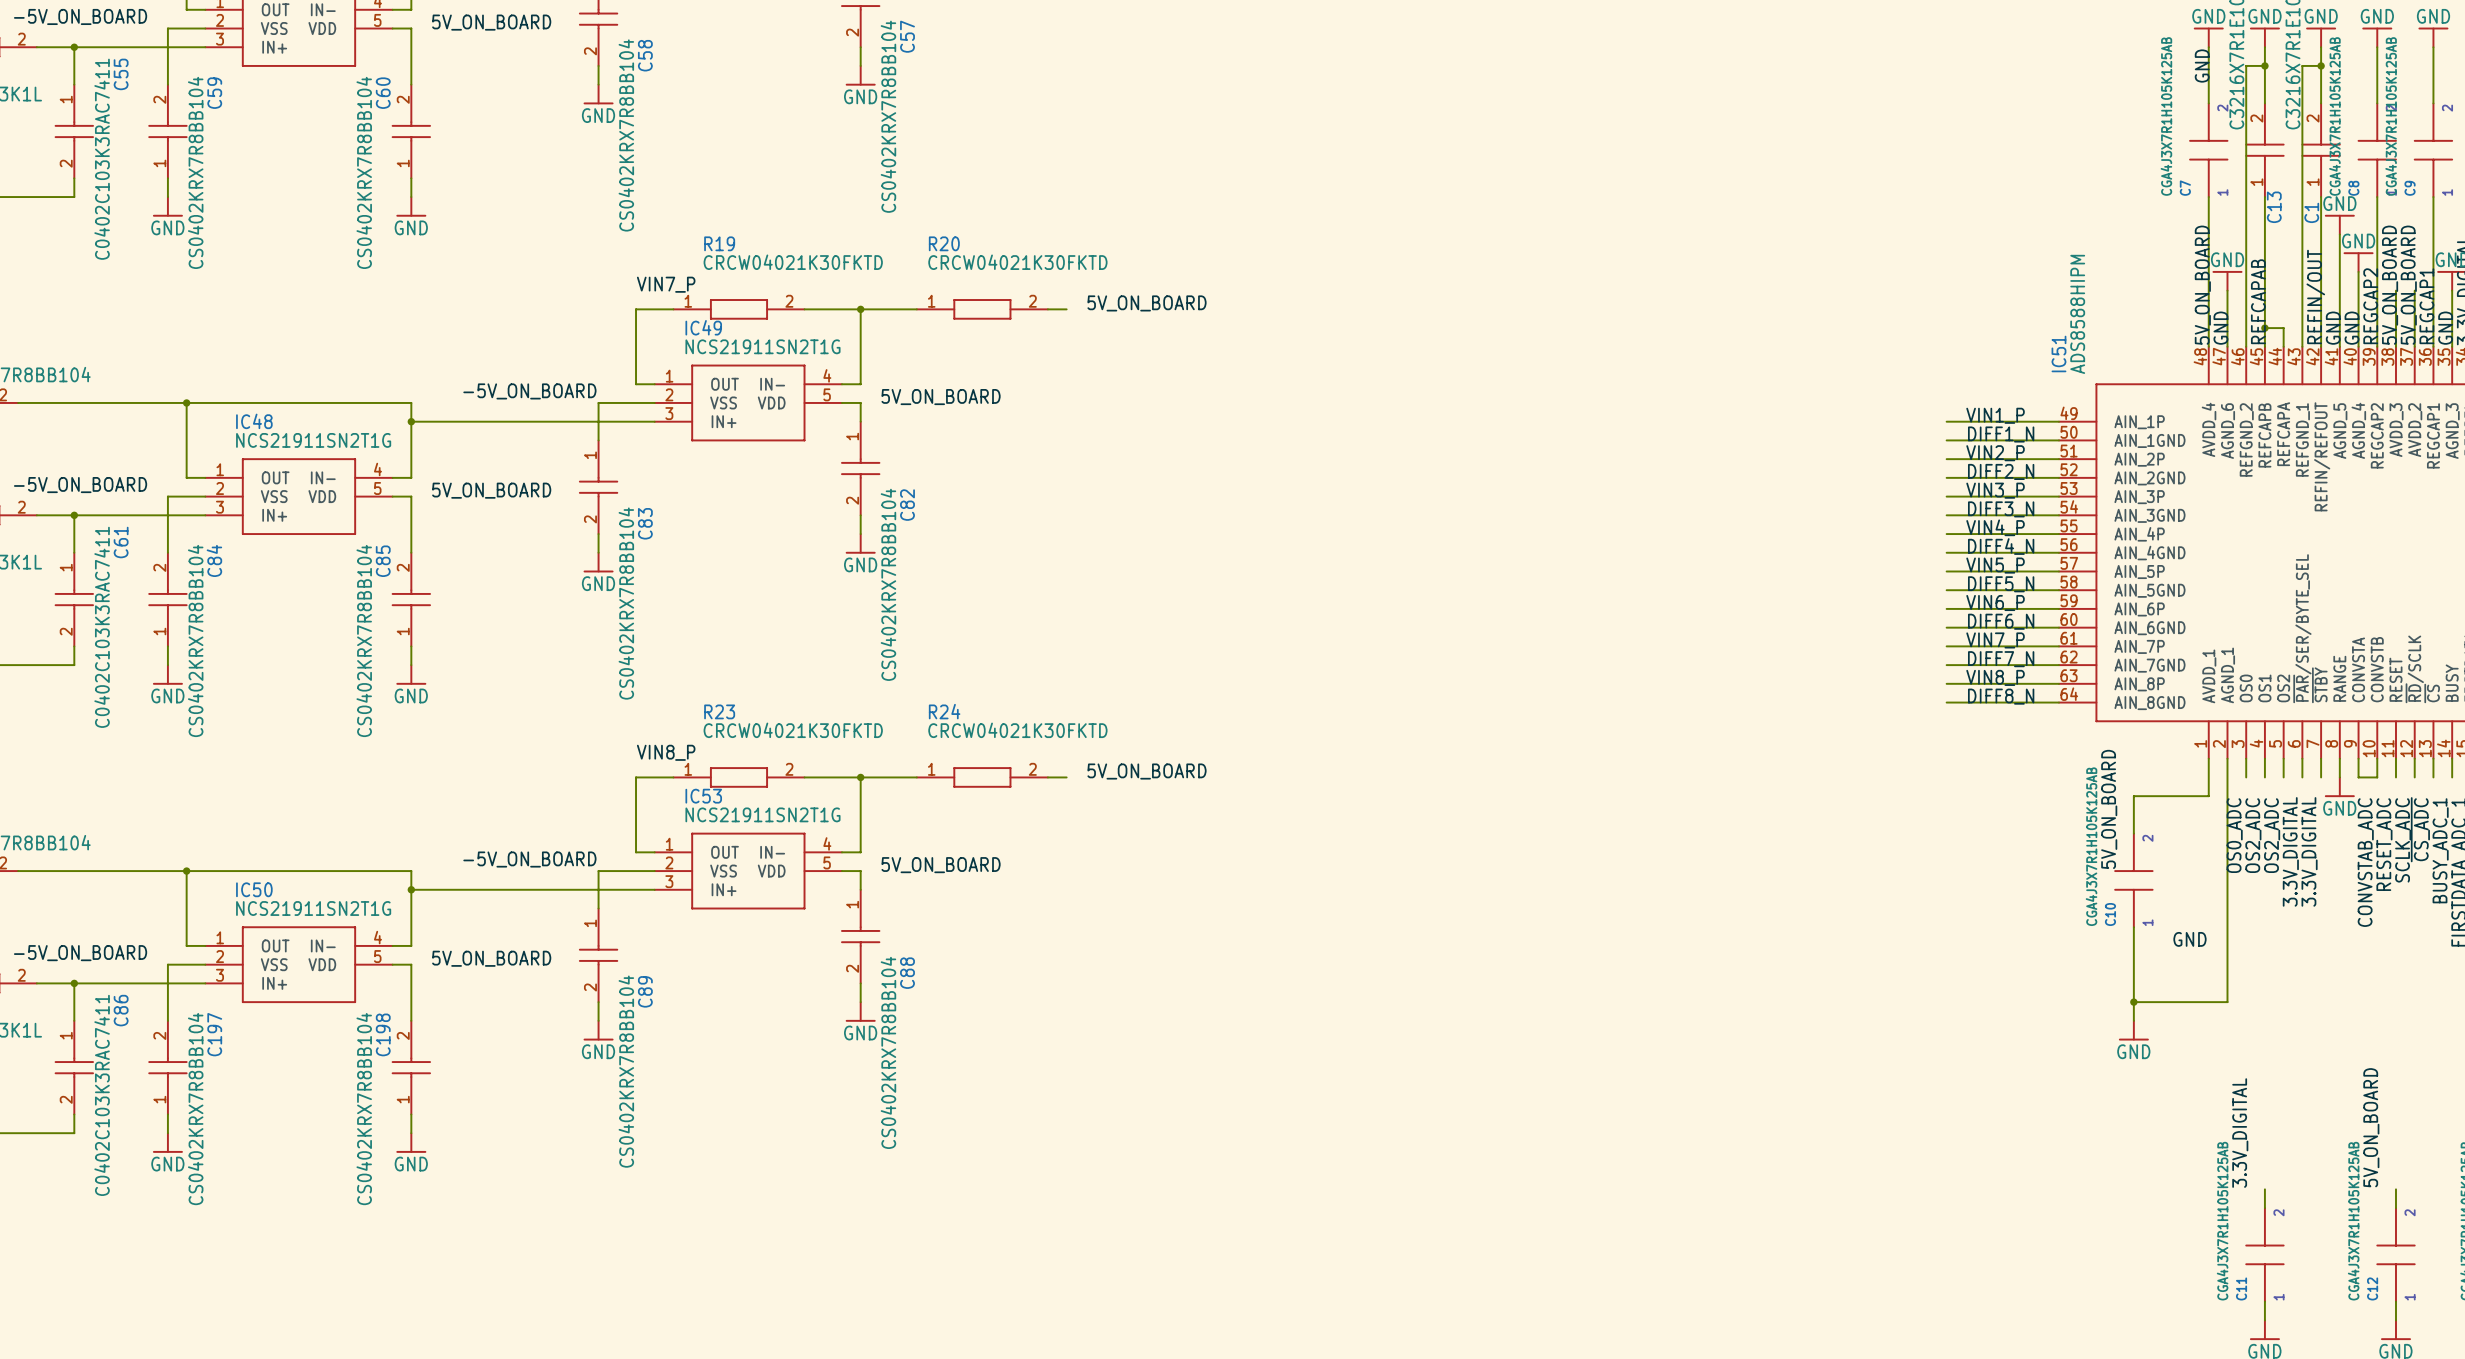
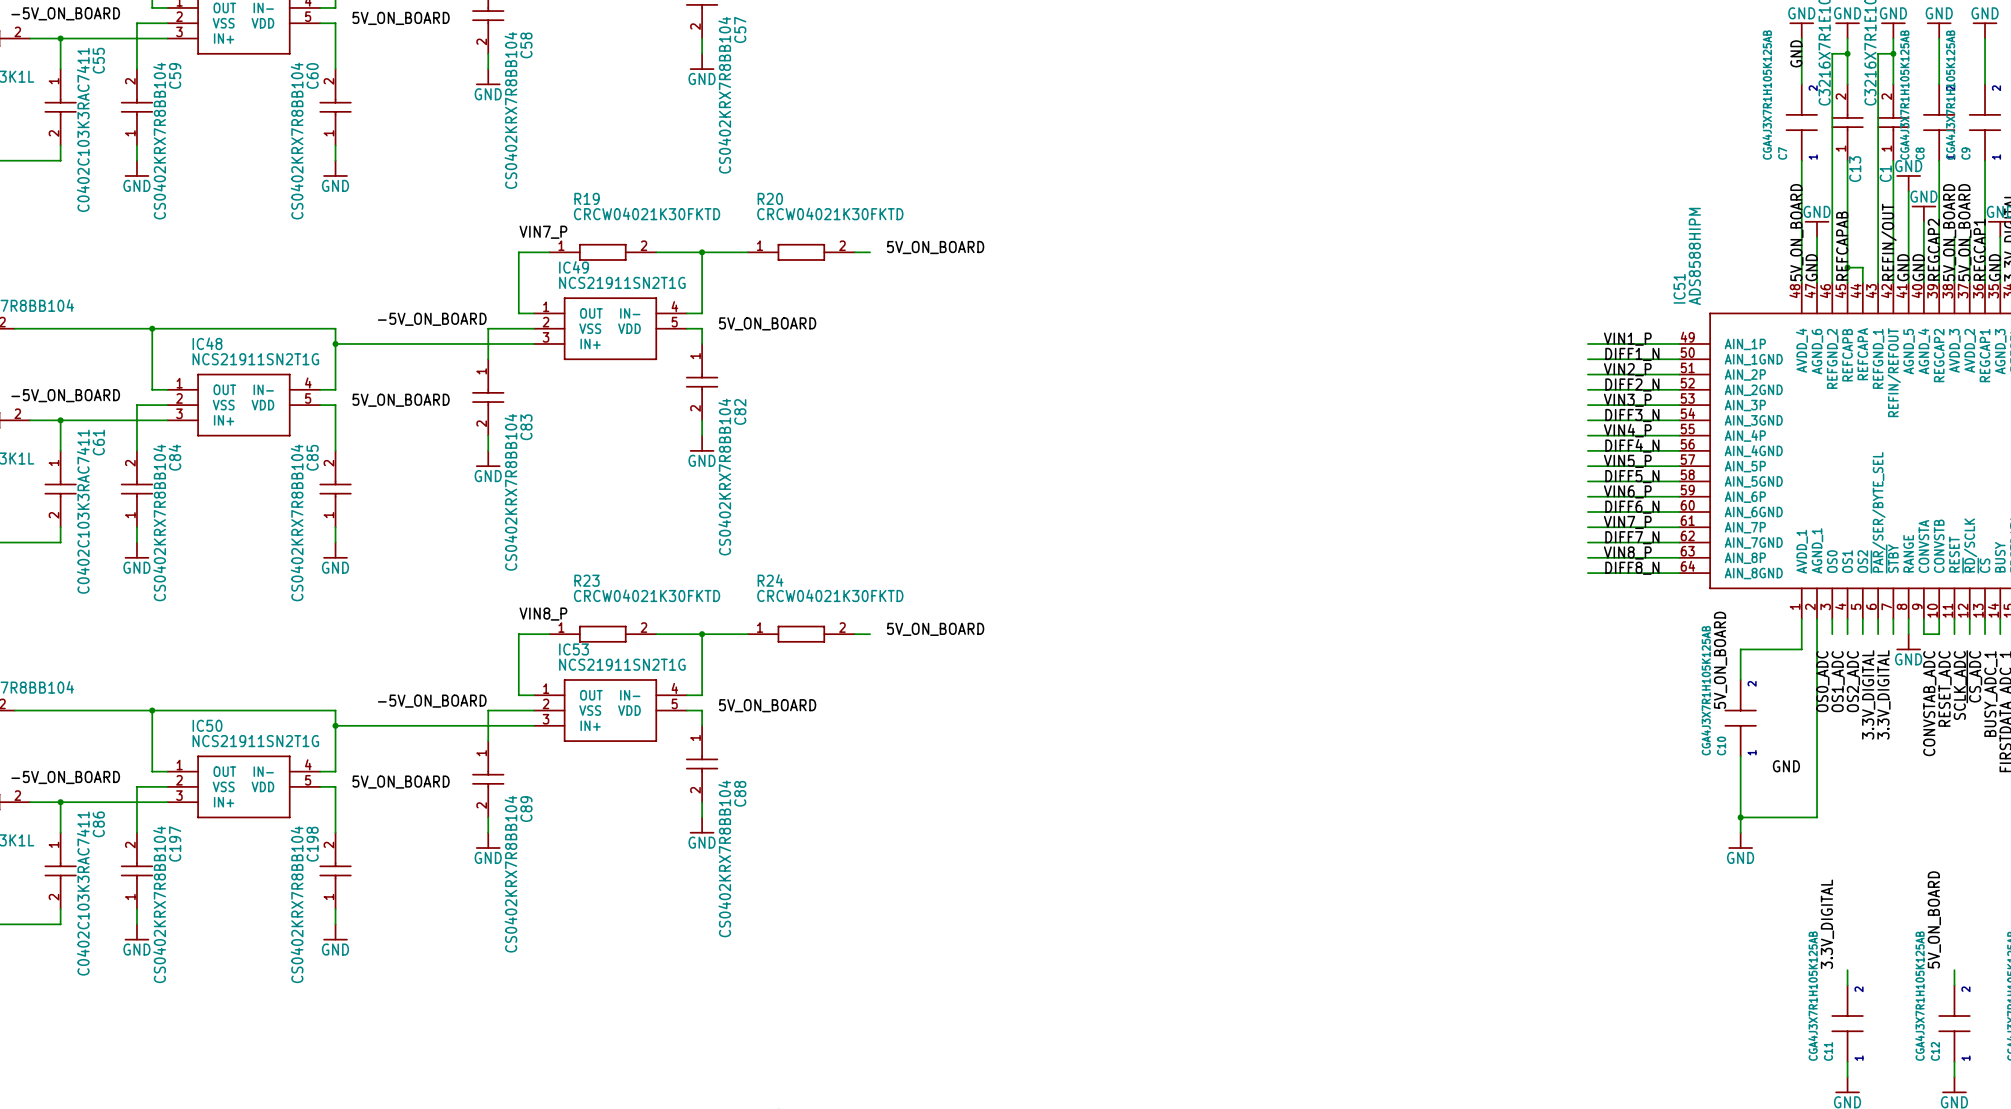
label: OS2_ADC (2253, 835) -> OS1_ADC (1838, 681)

